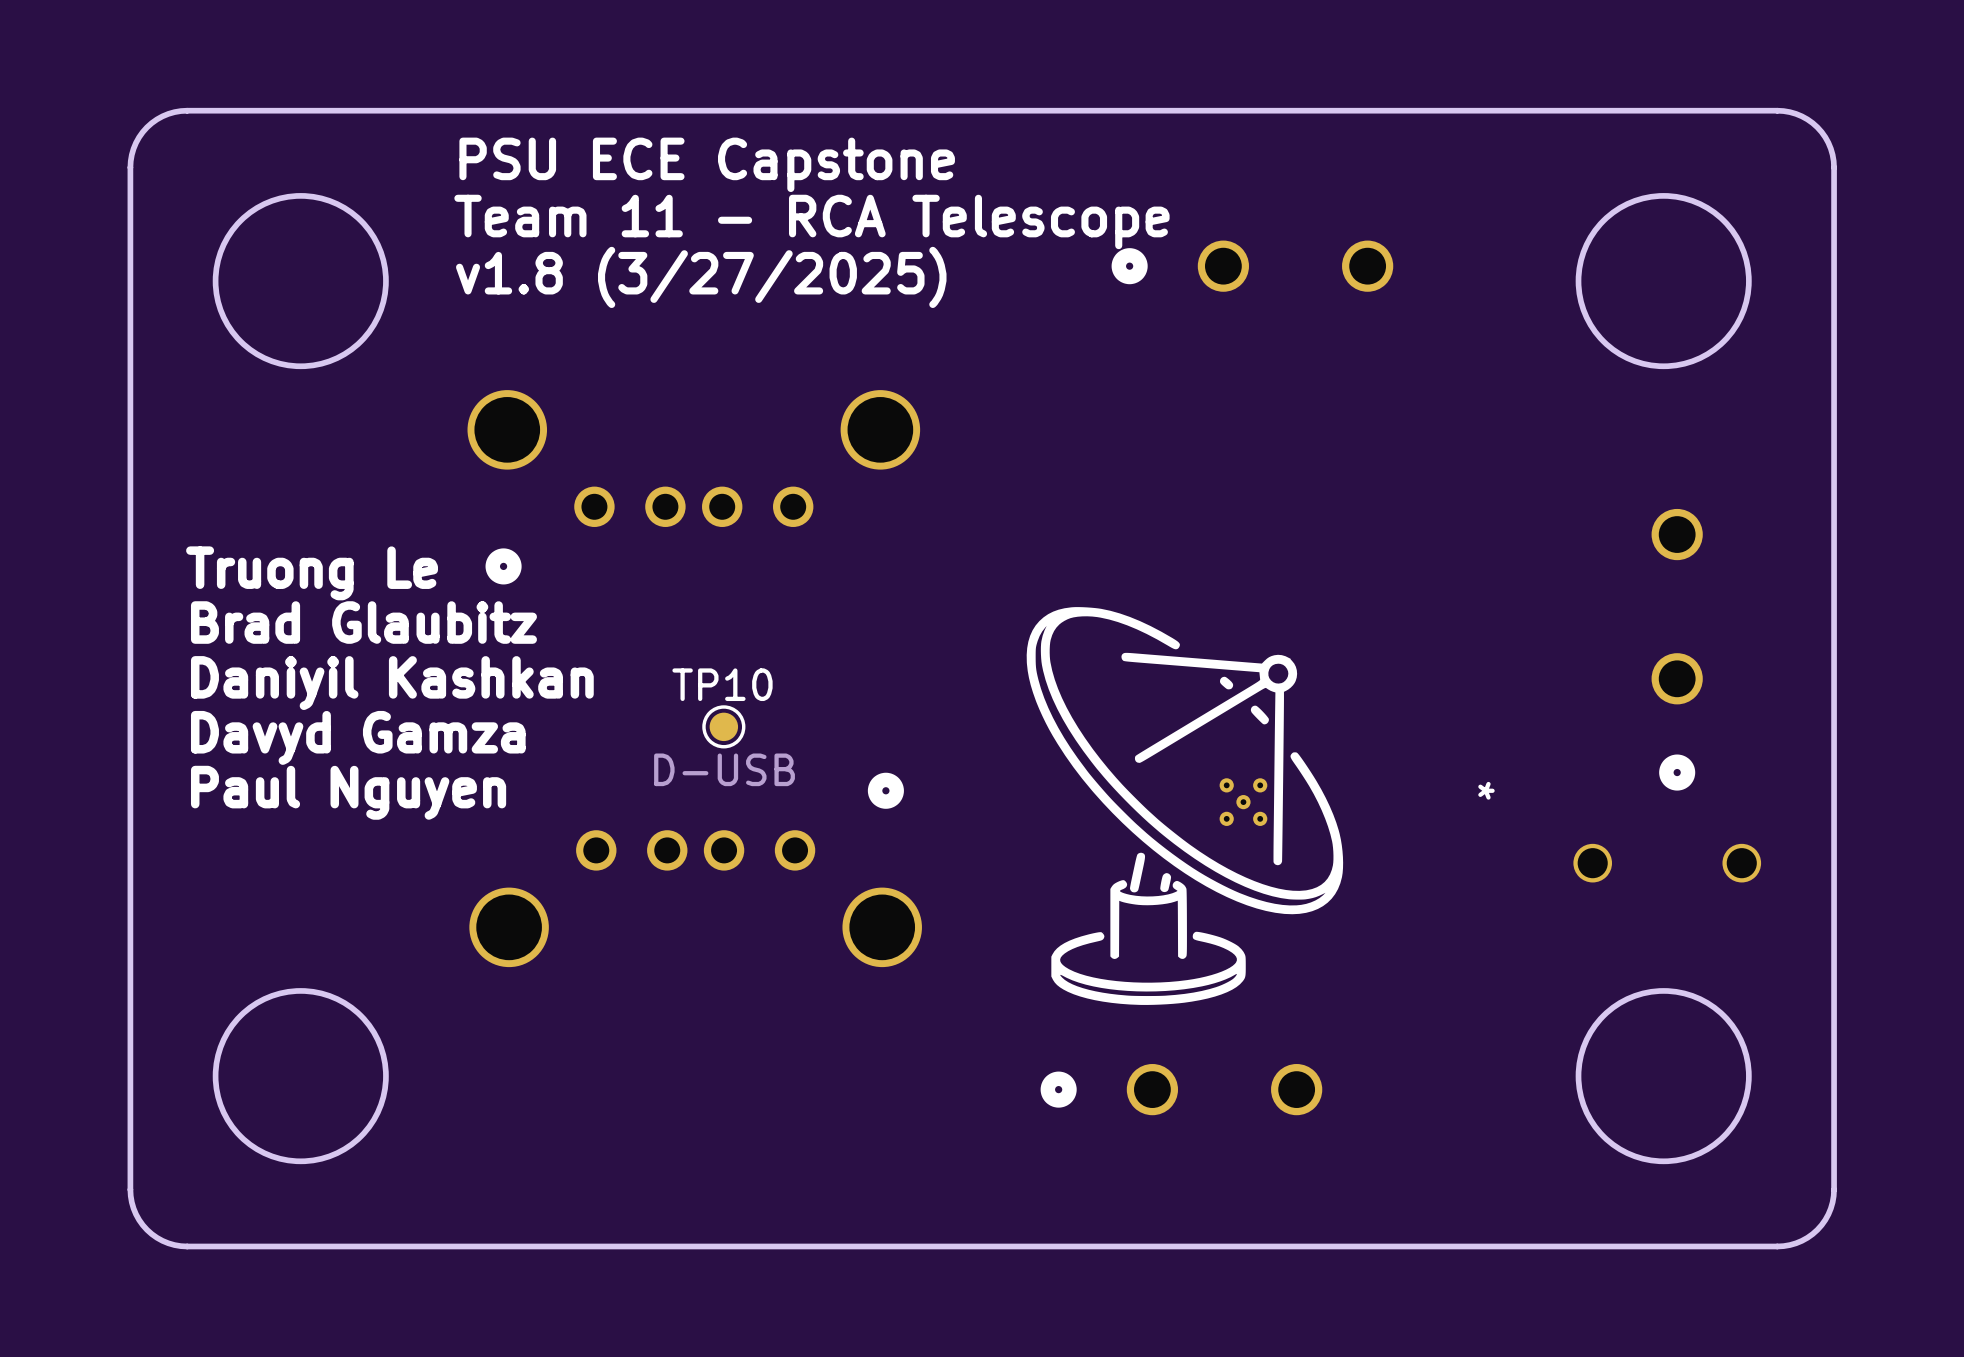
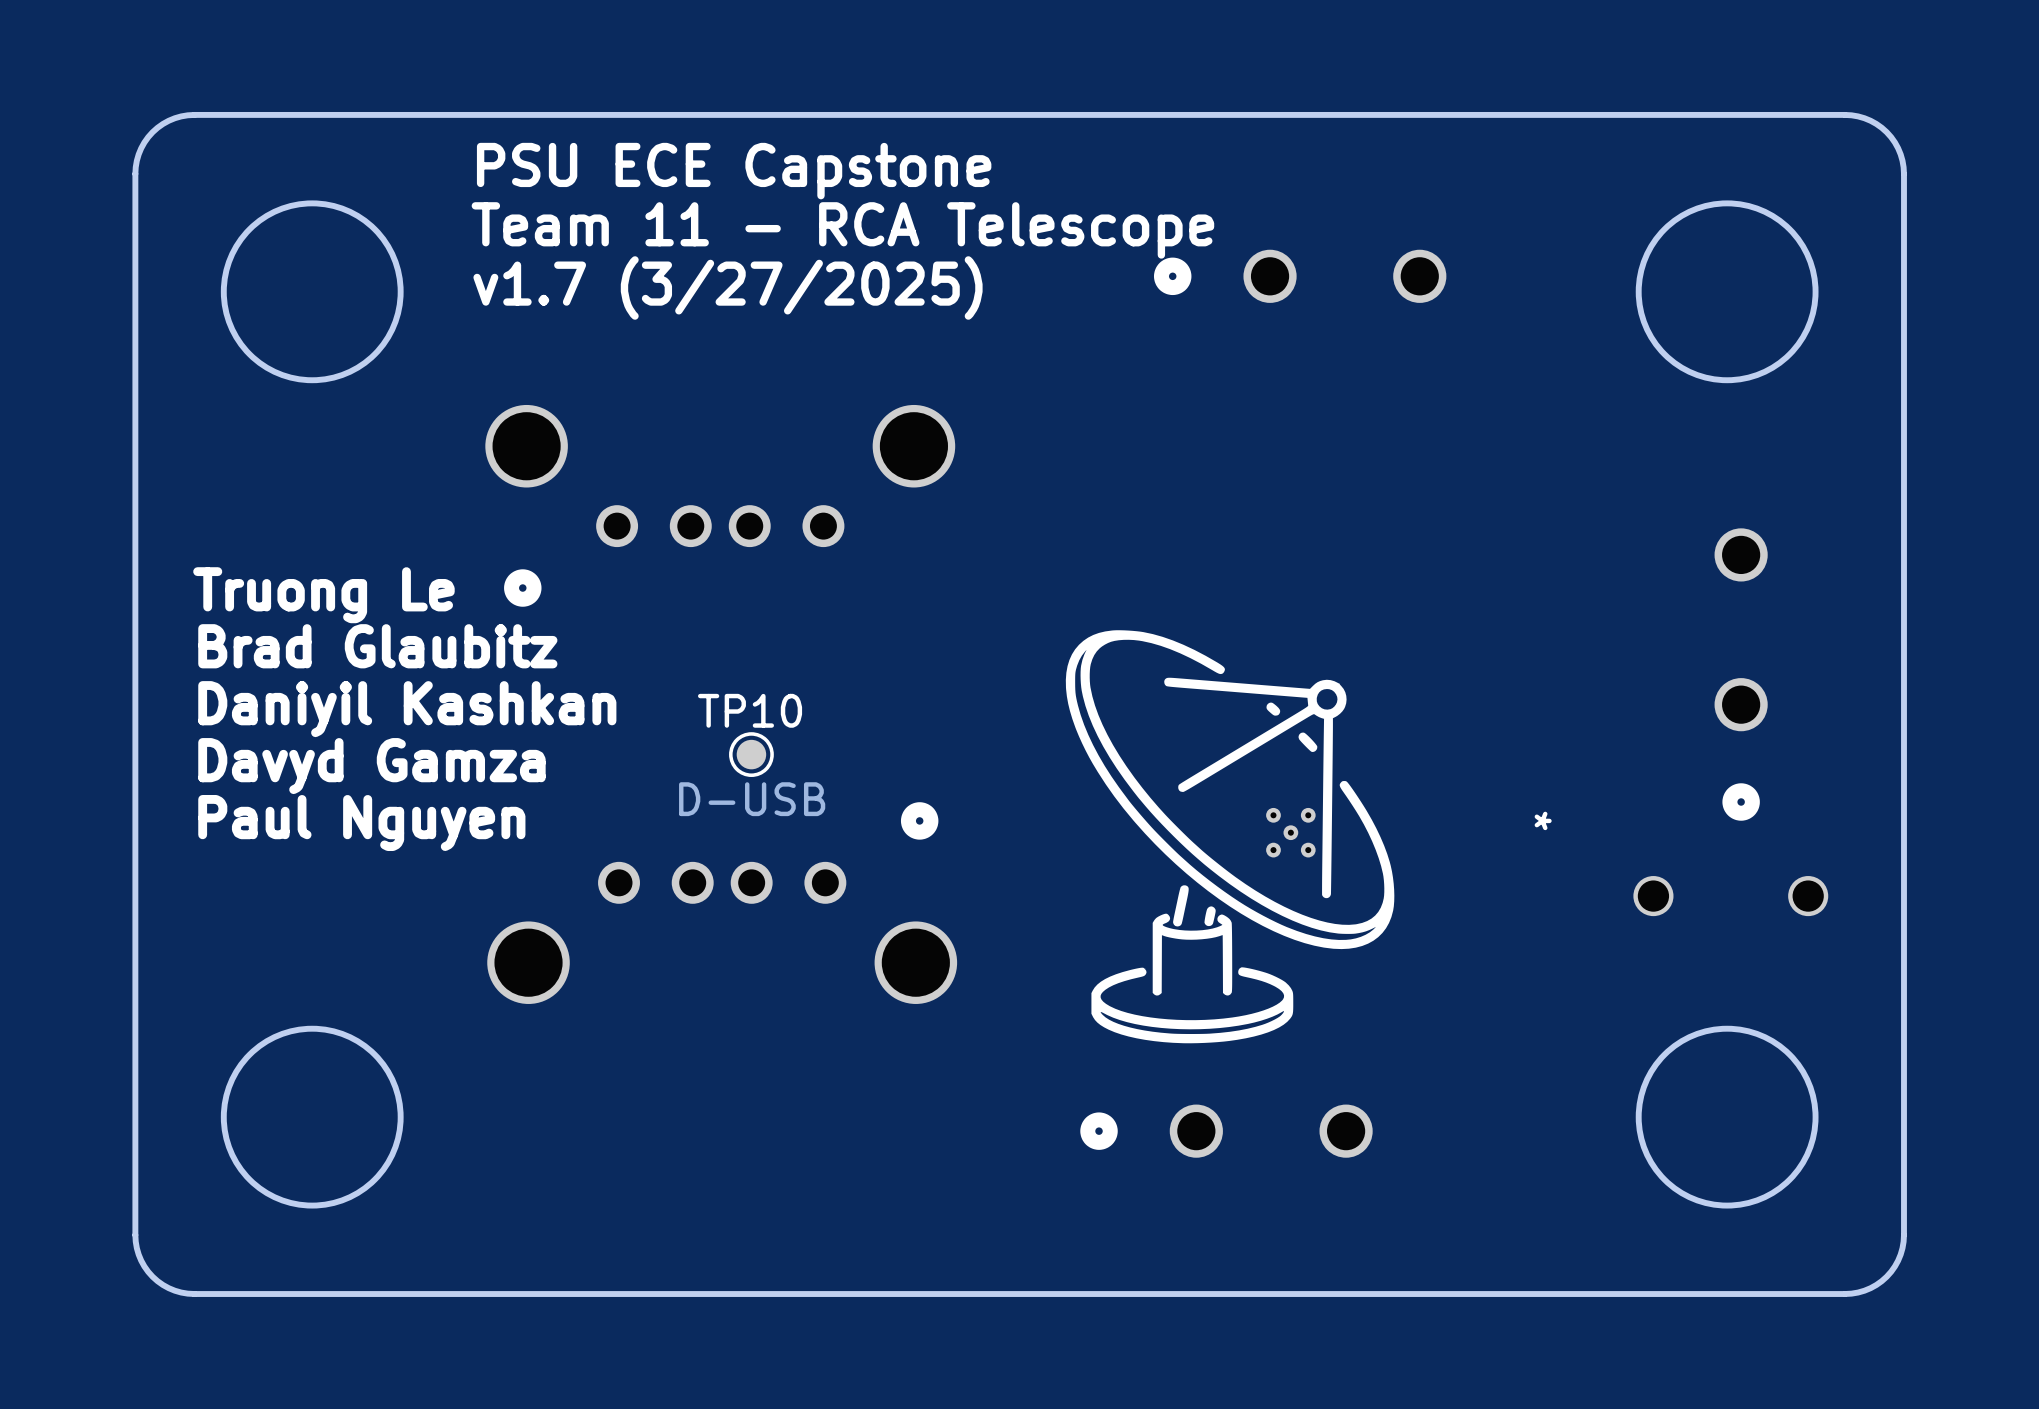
text: v1.8 (3/27/2025) (701, 277) -> v1.7 (3/27/2025) (728, 287)

